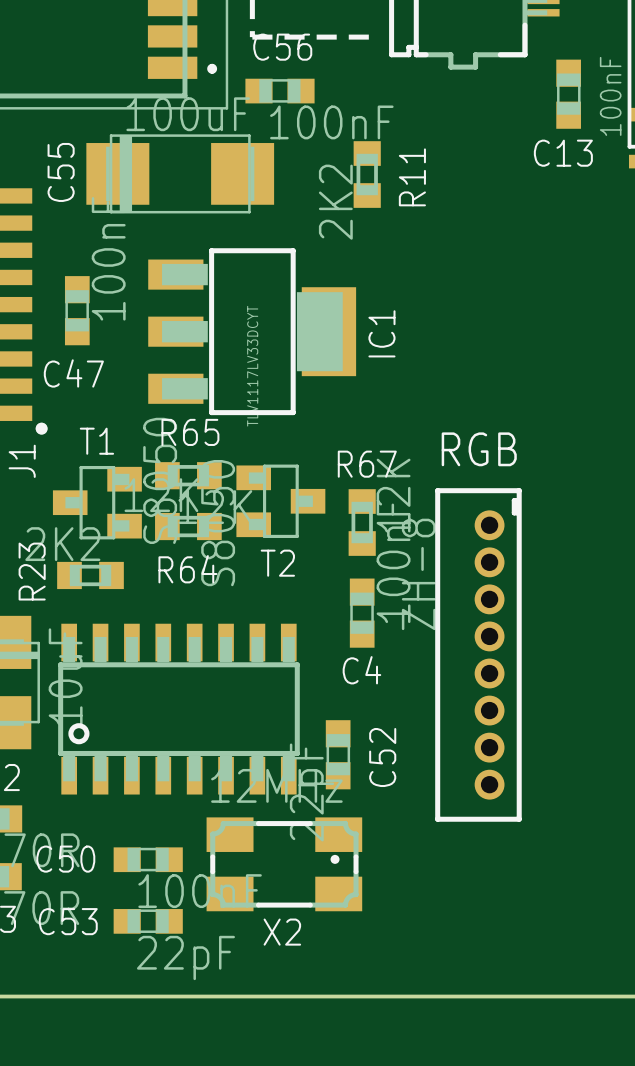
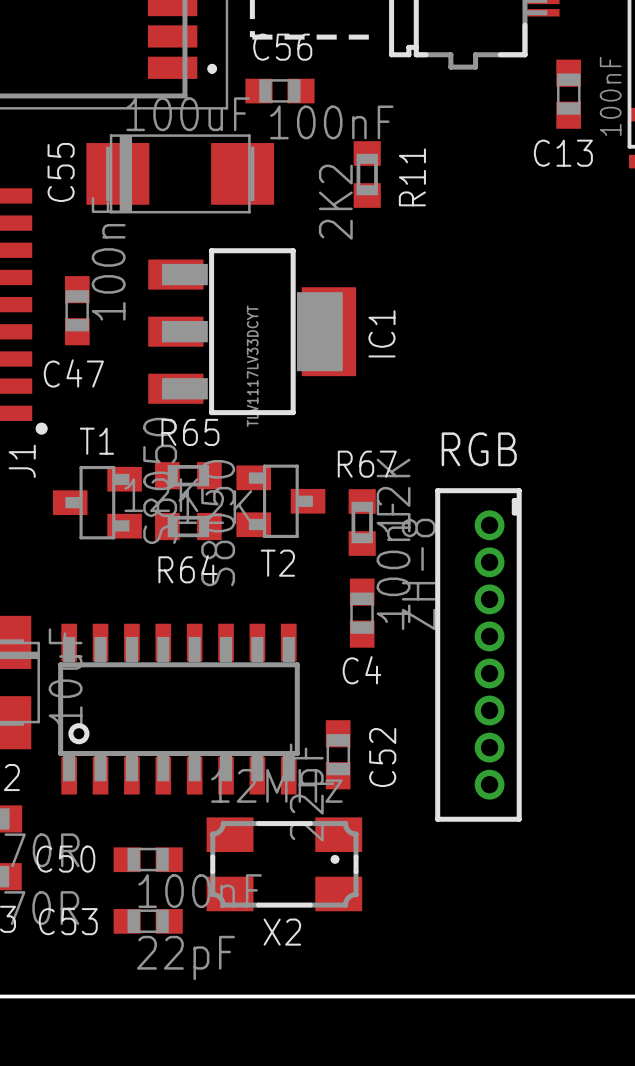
R23: 2K2 (90, 575) -> none

